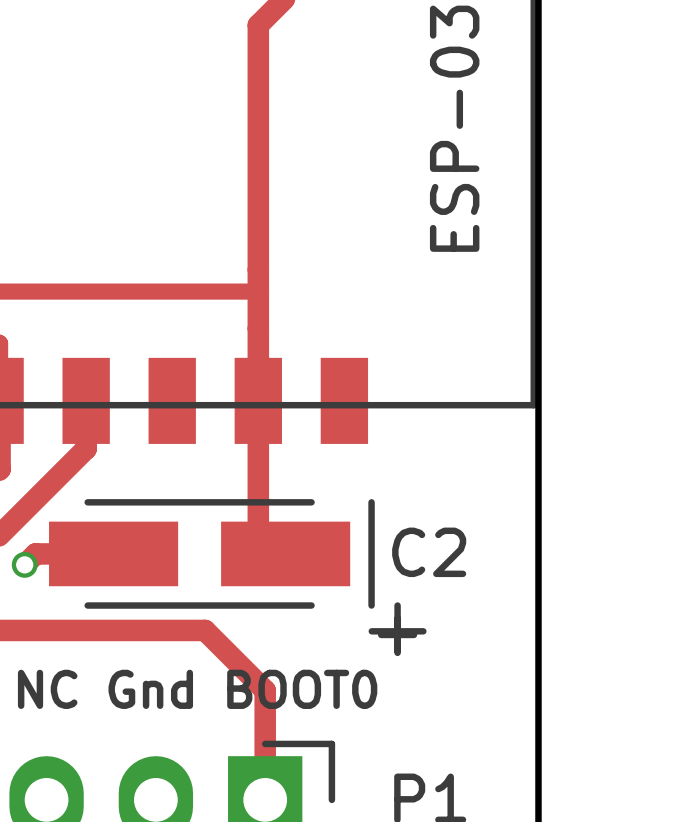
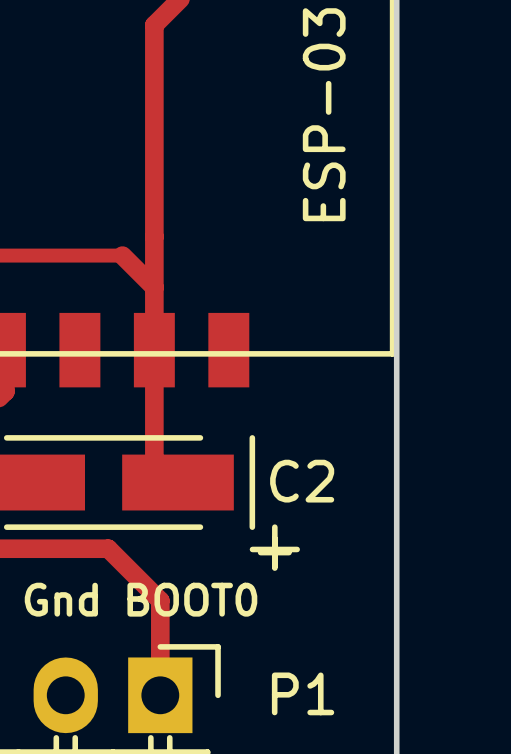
track: (221, 291) (258, 291) -> (122, 255) (154, 287)

